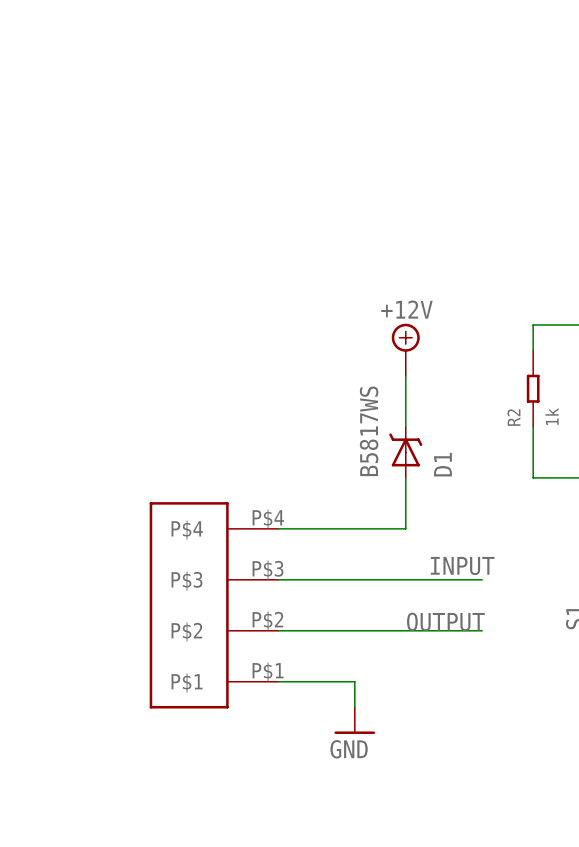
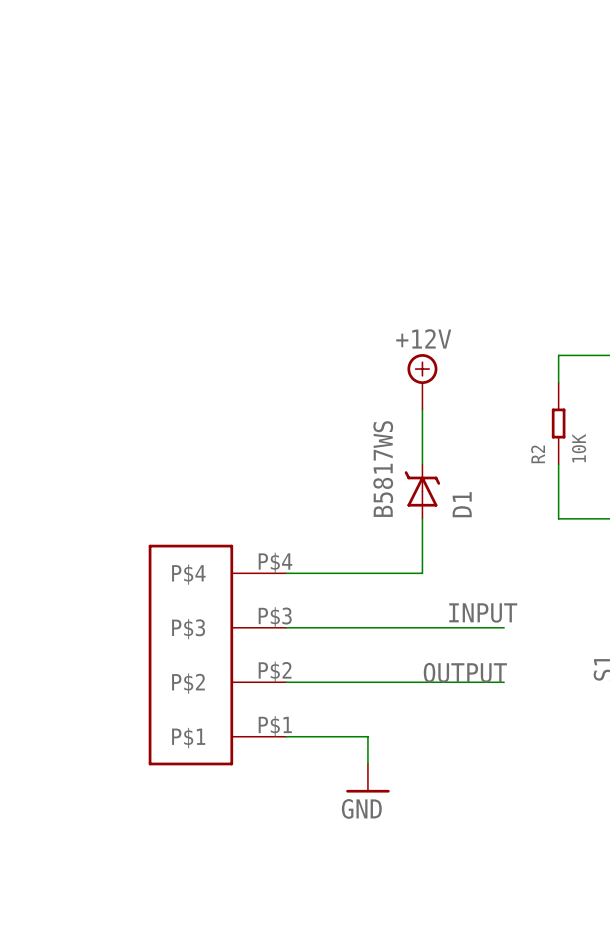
R2 value: 1k (552, 416) -> 10K (579, 448)

